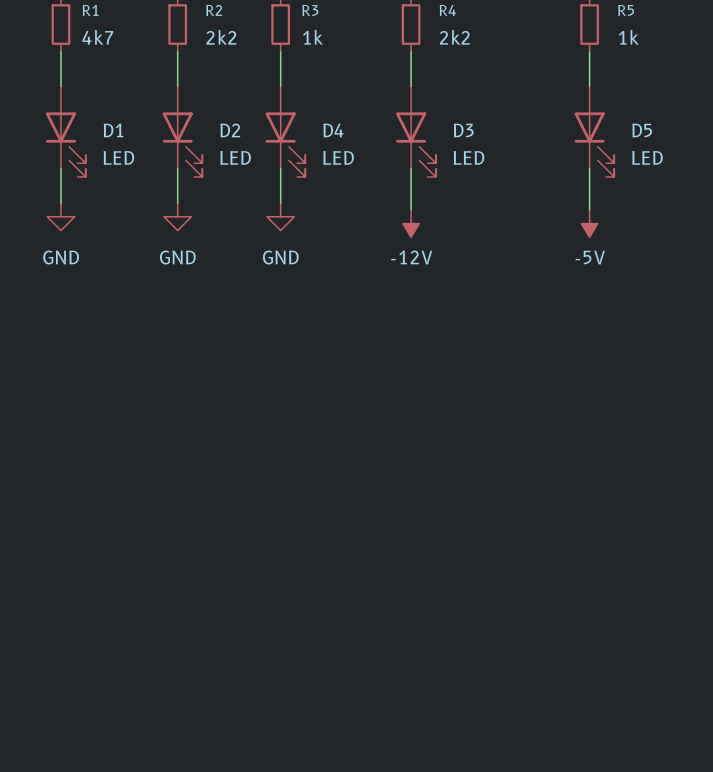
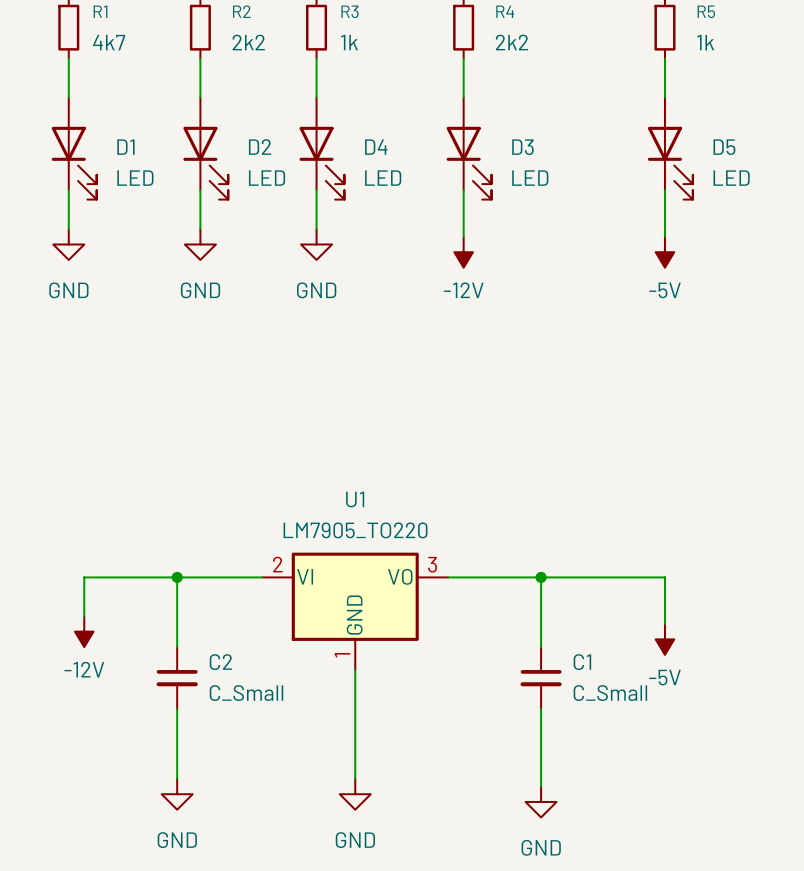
wire: none -> (177, 577) (177, 647)
junction: none -> (177, 577)
wire: none -> (262, 577) (84, 577) (84, 616)
wire: none -> (448, 577) (664, 577) (664, 623)
wire: none -> (541, 577) (541, 647)
junction: none -> (541, 577)
U1: none -> LM7905_TO220 (355, 611)
power symbol: none -> -12V (84, 631)
power symbol: none -> -5V (664, 639)
wire: none -> (355, 670) (355, 778)
C2: none -> C_Small (177, 678)
C1: none -> C_Small (541, 678)
wire: none -> (177, 709) (177, 778)
wire: none -> (541, 709) (541, 786)
power symbol: none -> GND (177, 794)
power symbol: none -> GND (355, 794)
power symbol: none -> GND (541, 801)

